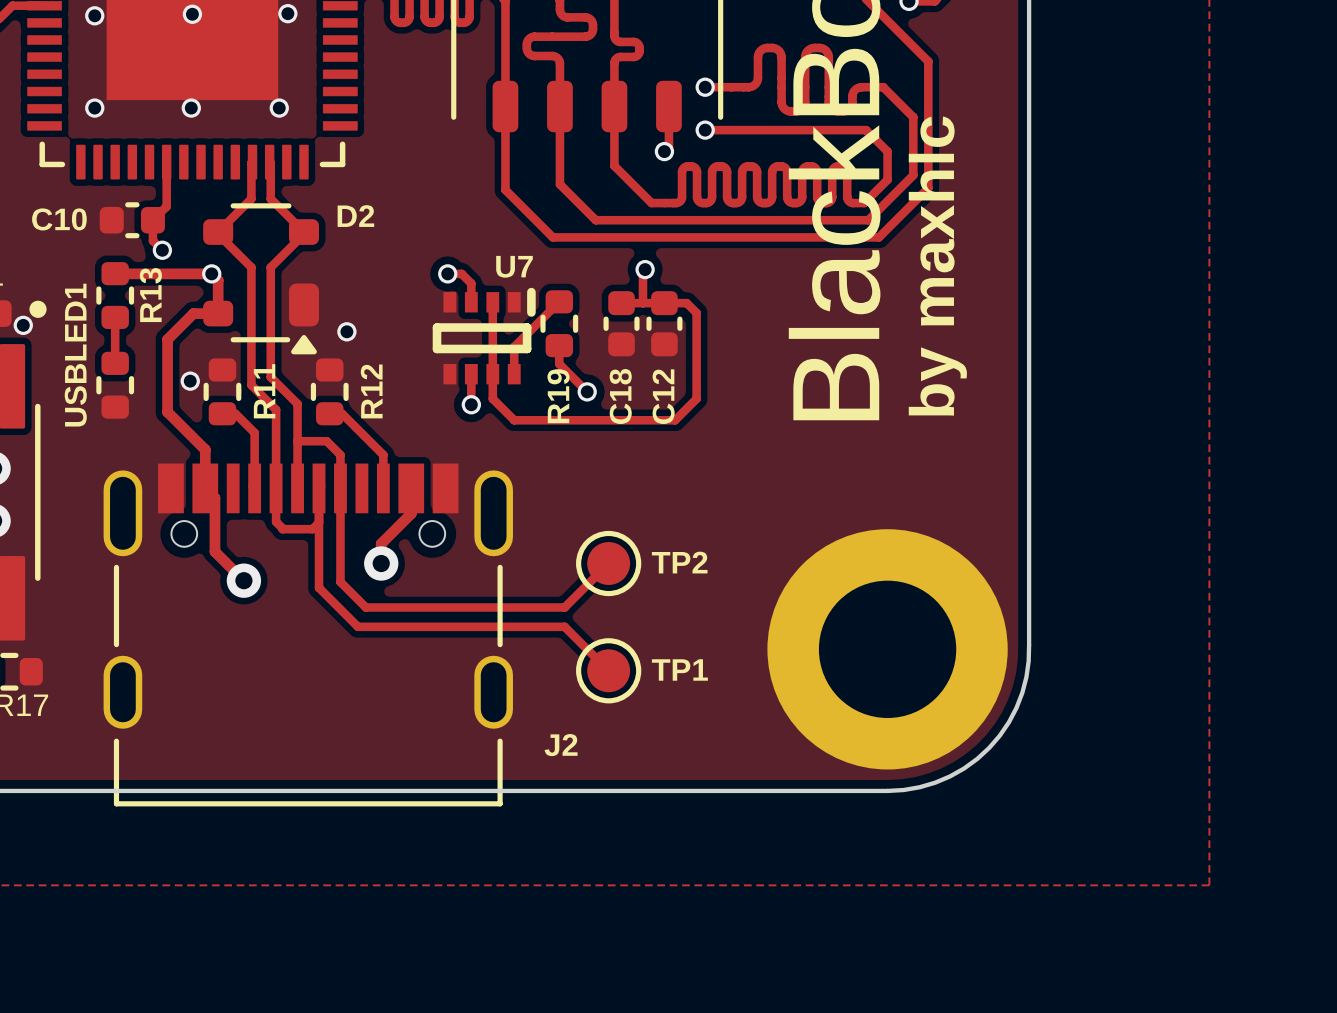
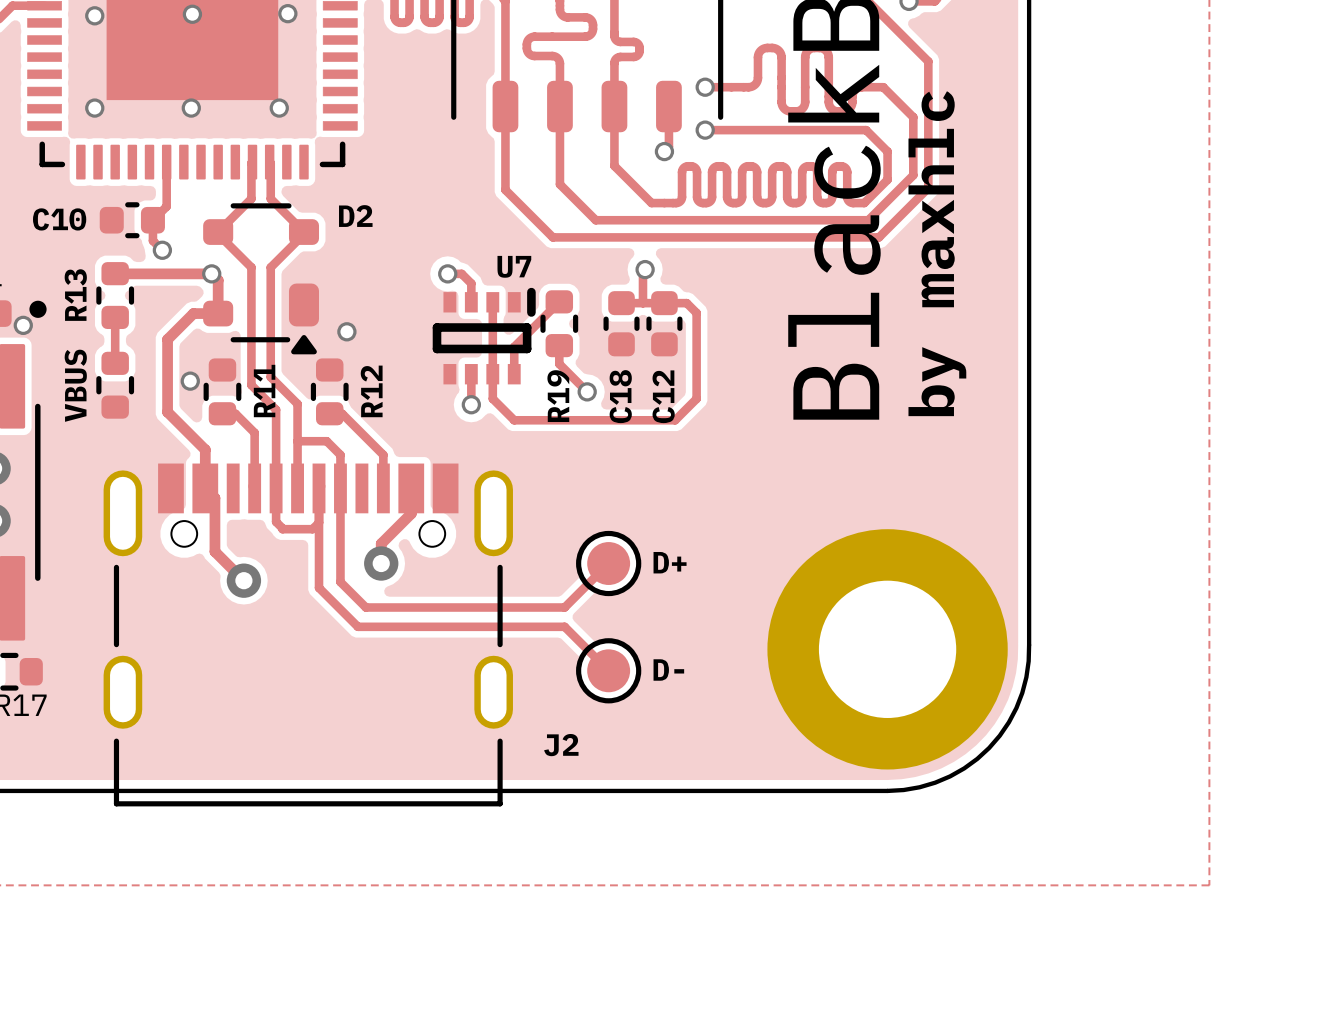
R13 name position: R13 (150, 295) -> R13 (75, 295)
USBLED1 name: USBLED1 (75, 355) -> VBUS (75, 385)
TP2 name: TP2 (679, 562) -> D+ (670, 562)
TP1 name: TP1 (679, 669) -> D- (668, 669)

